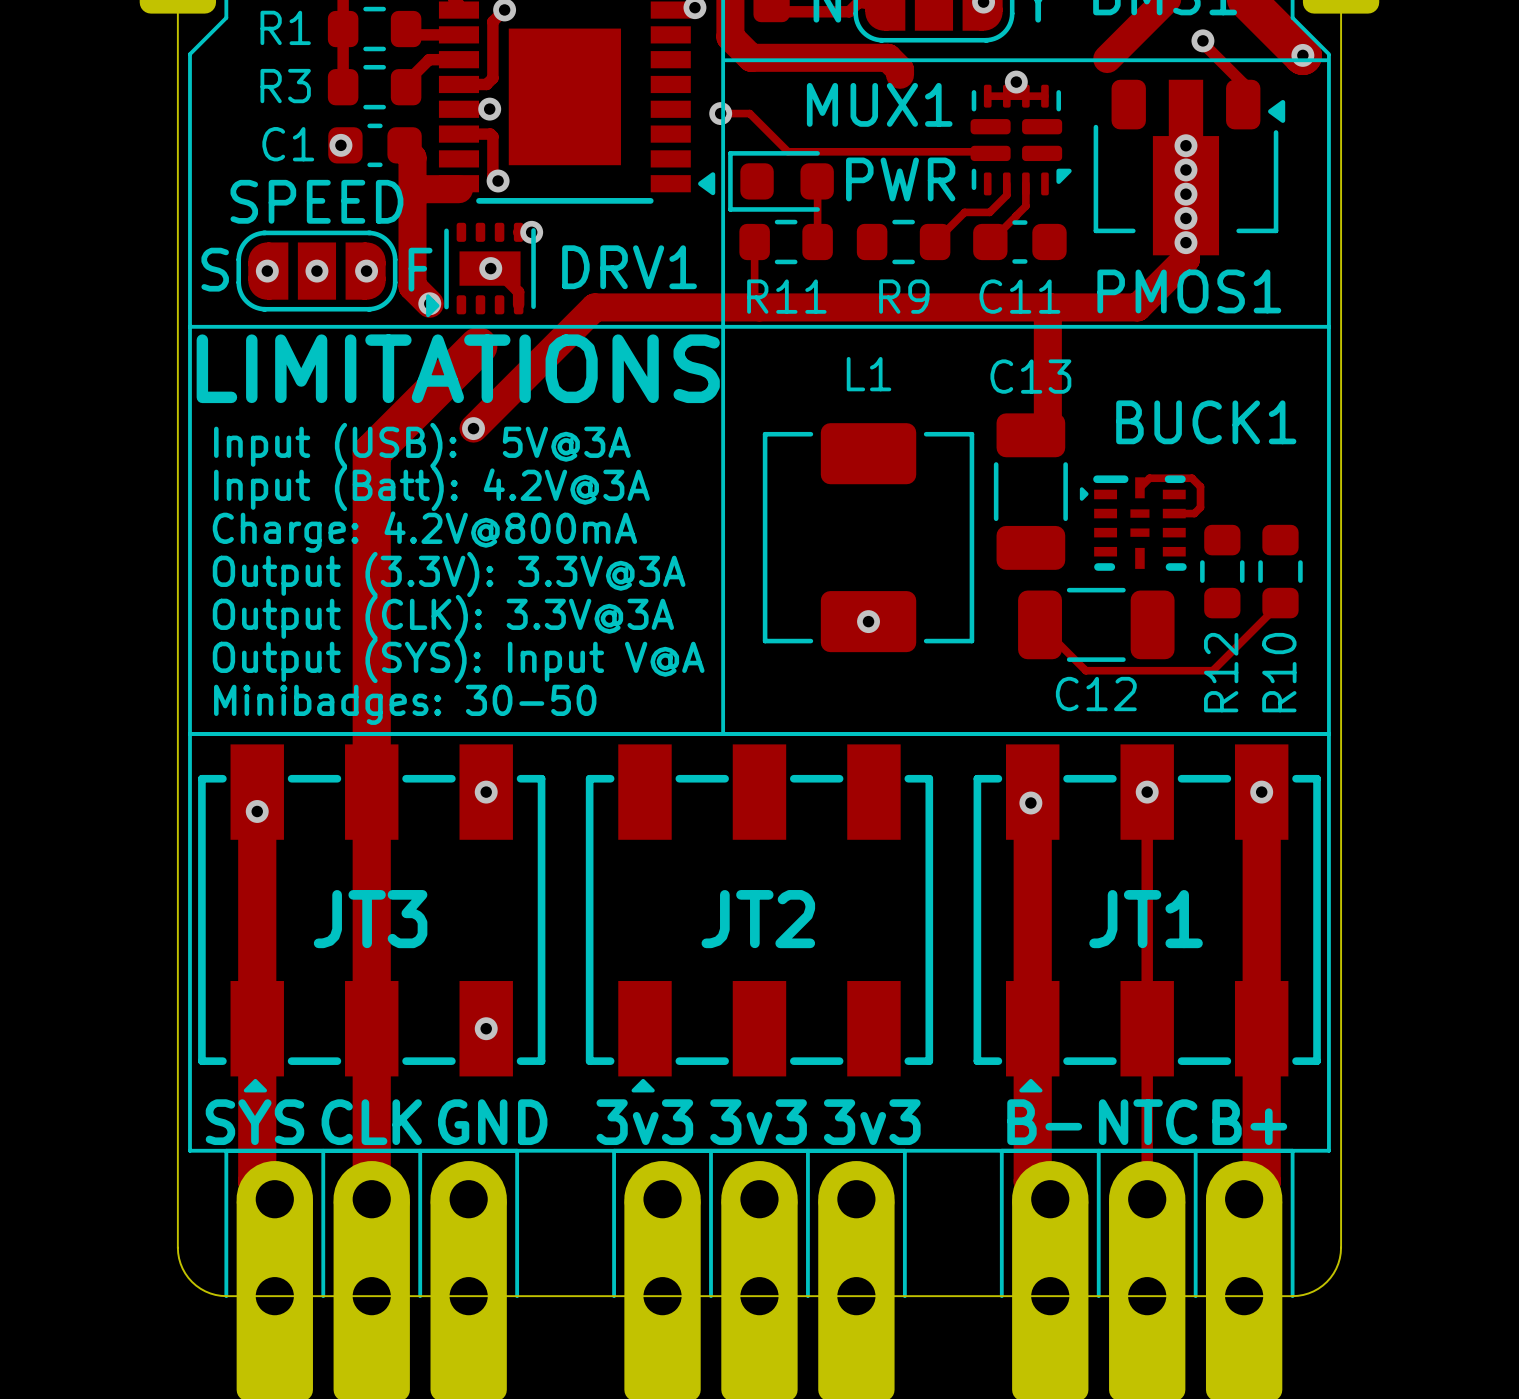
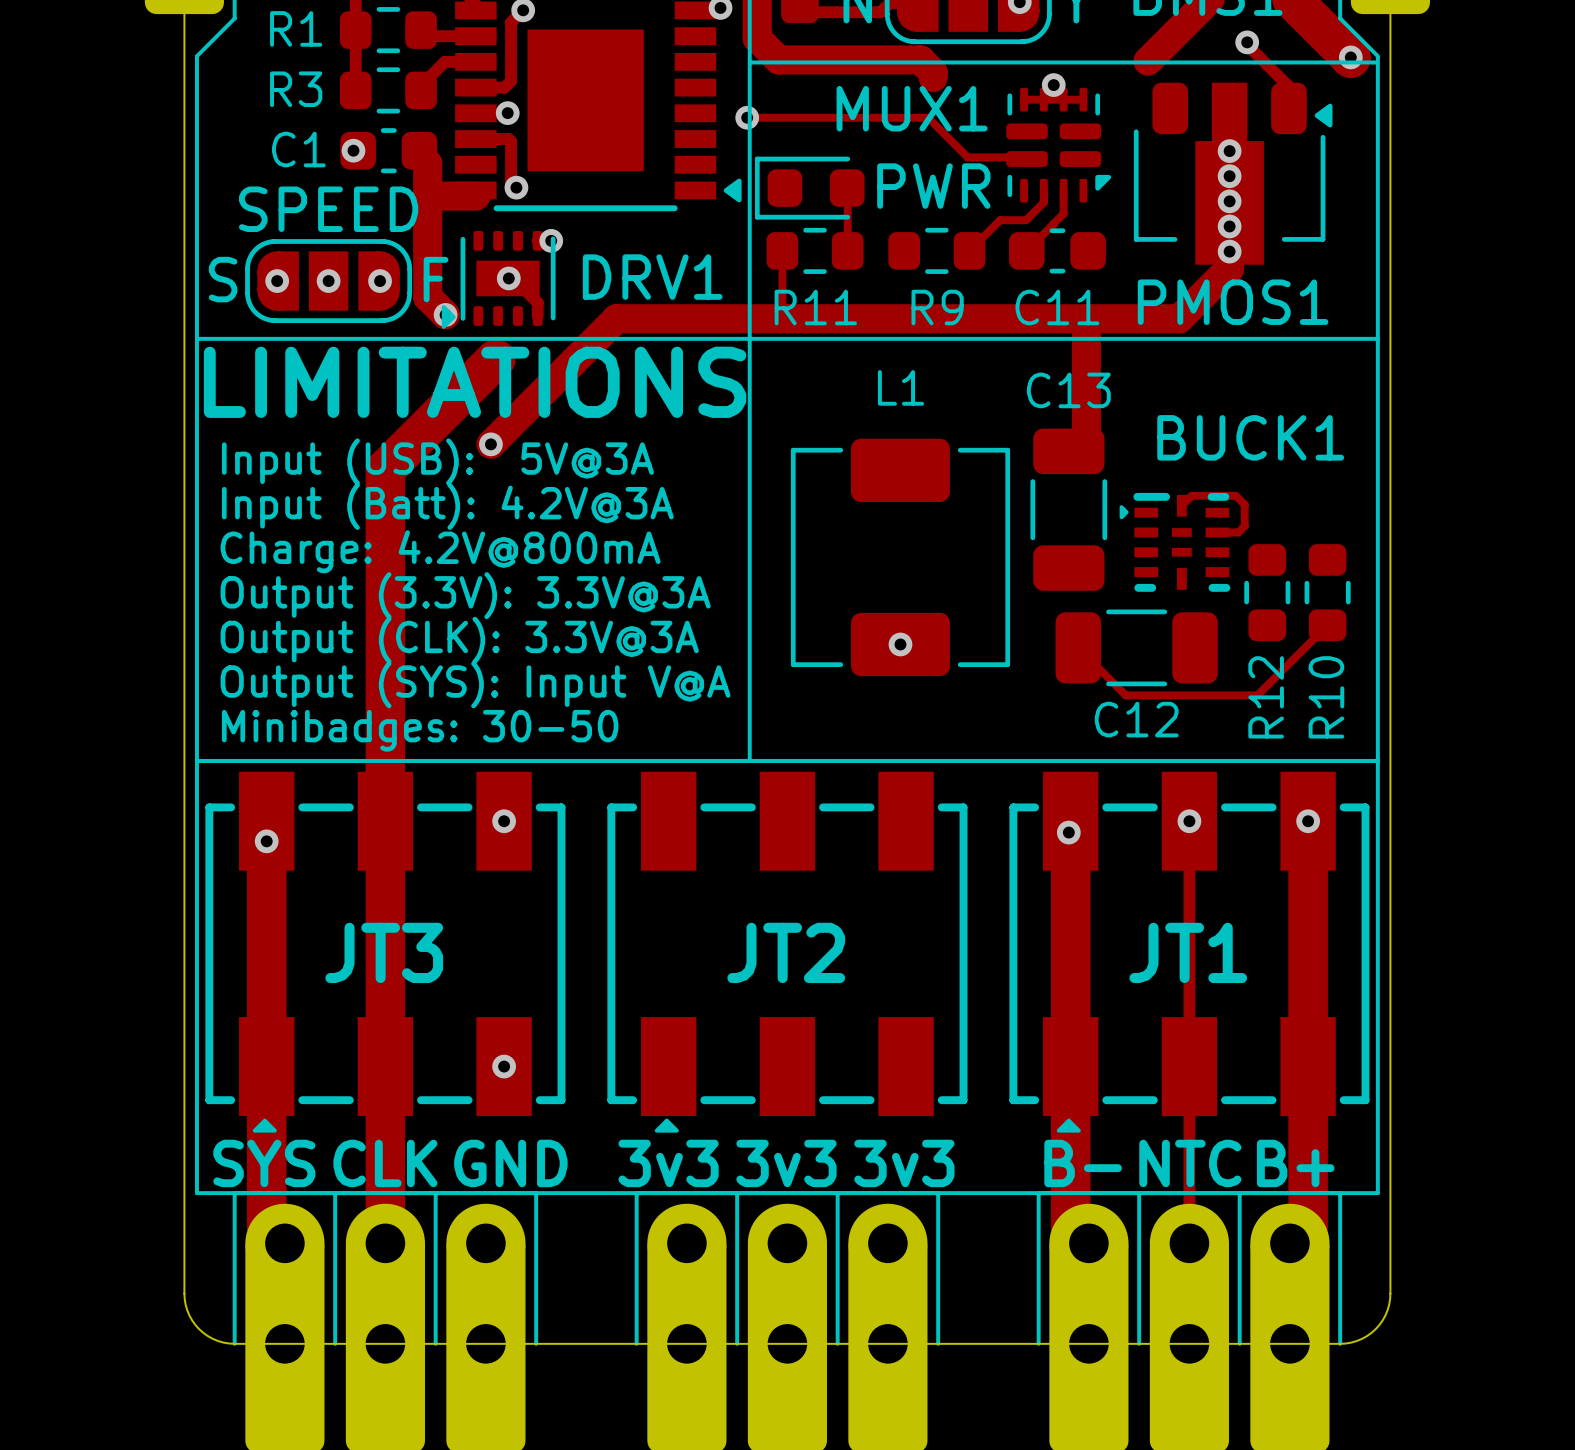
track: (749, 113) (788, 151) (933, 151) -> (777, 117) (928, 117) (967, 157)

